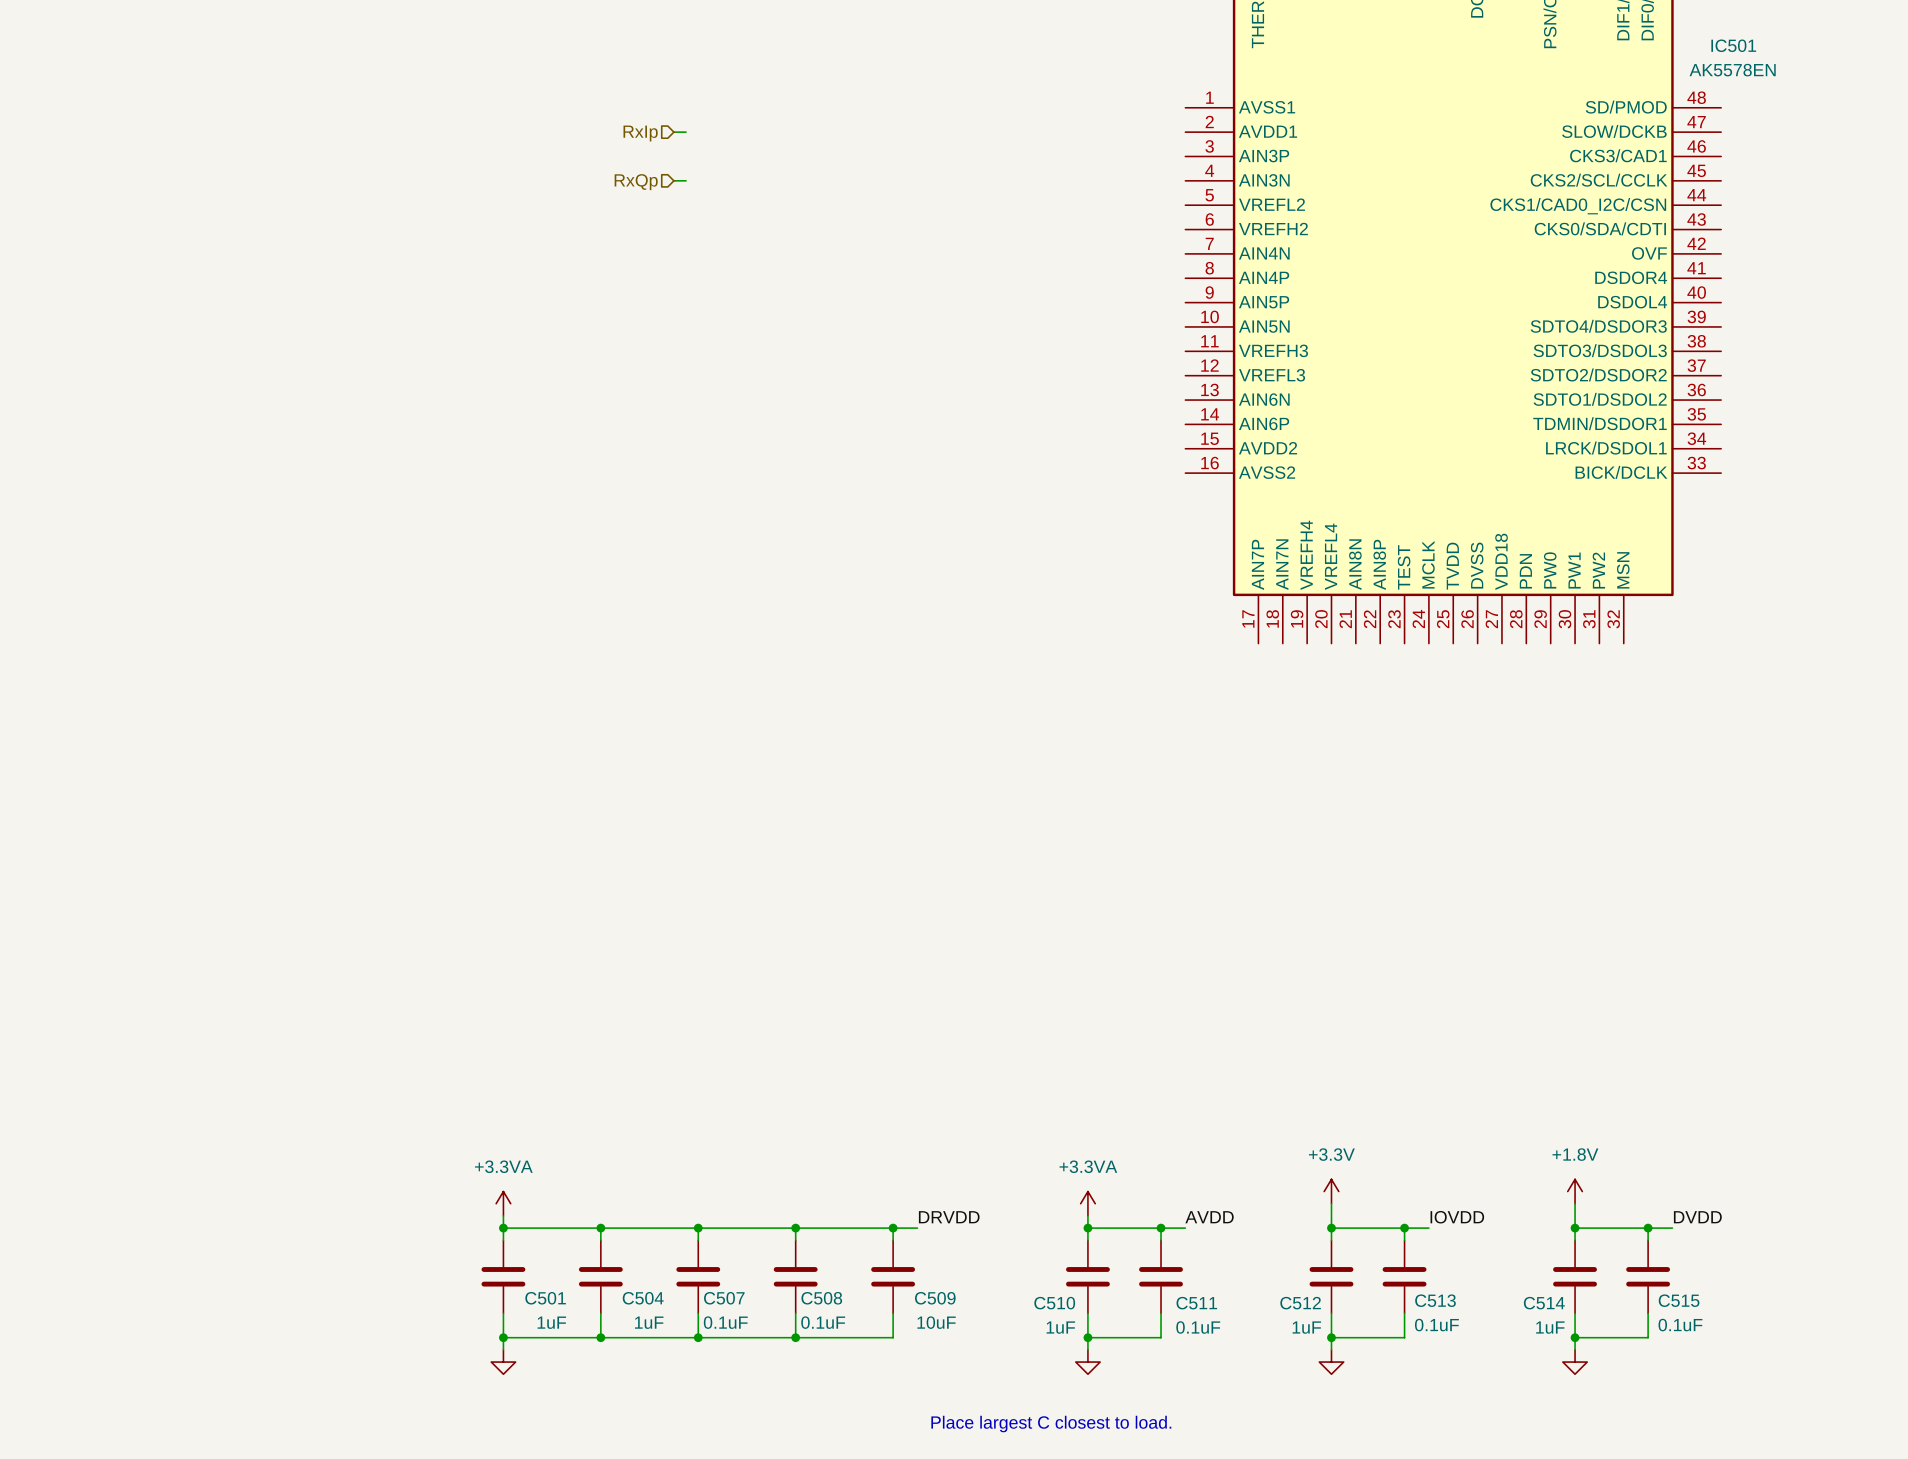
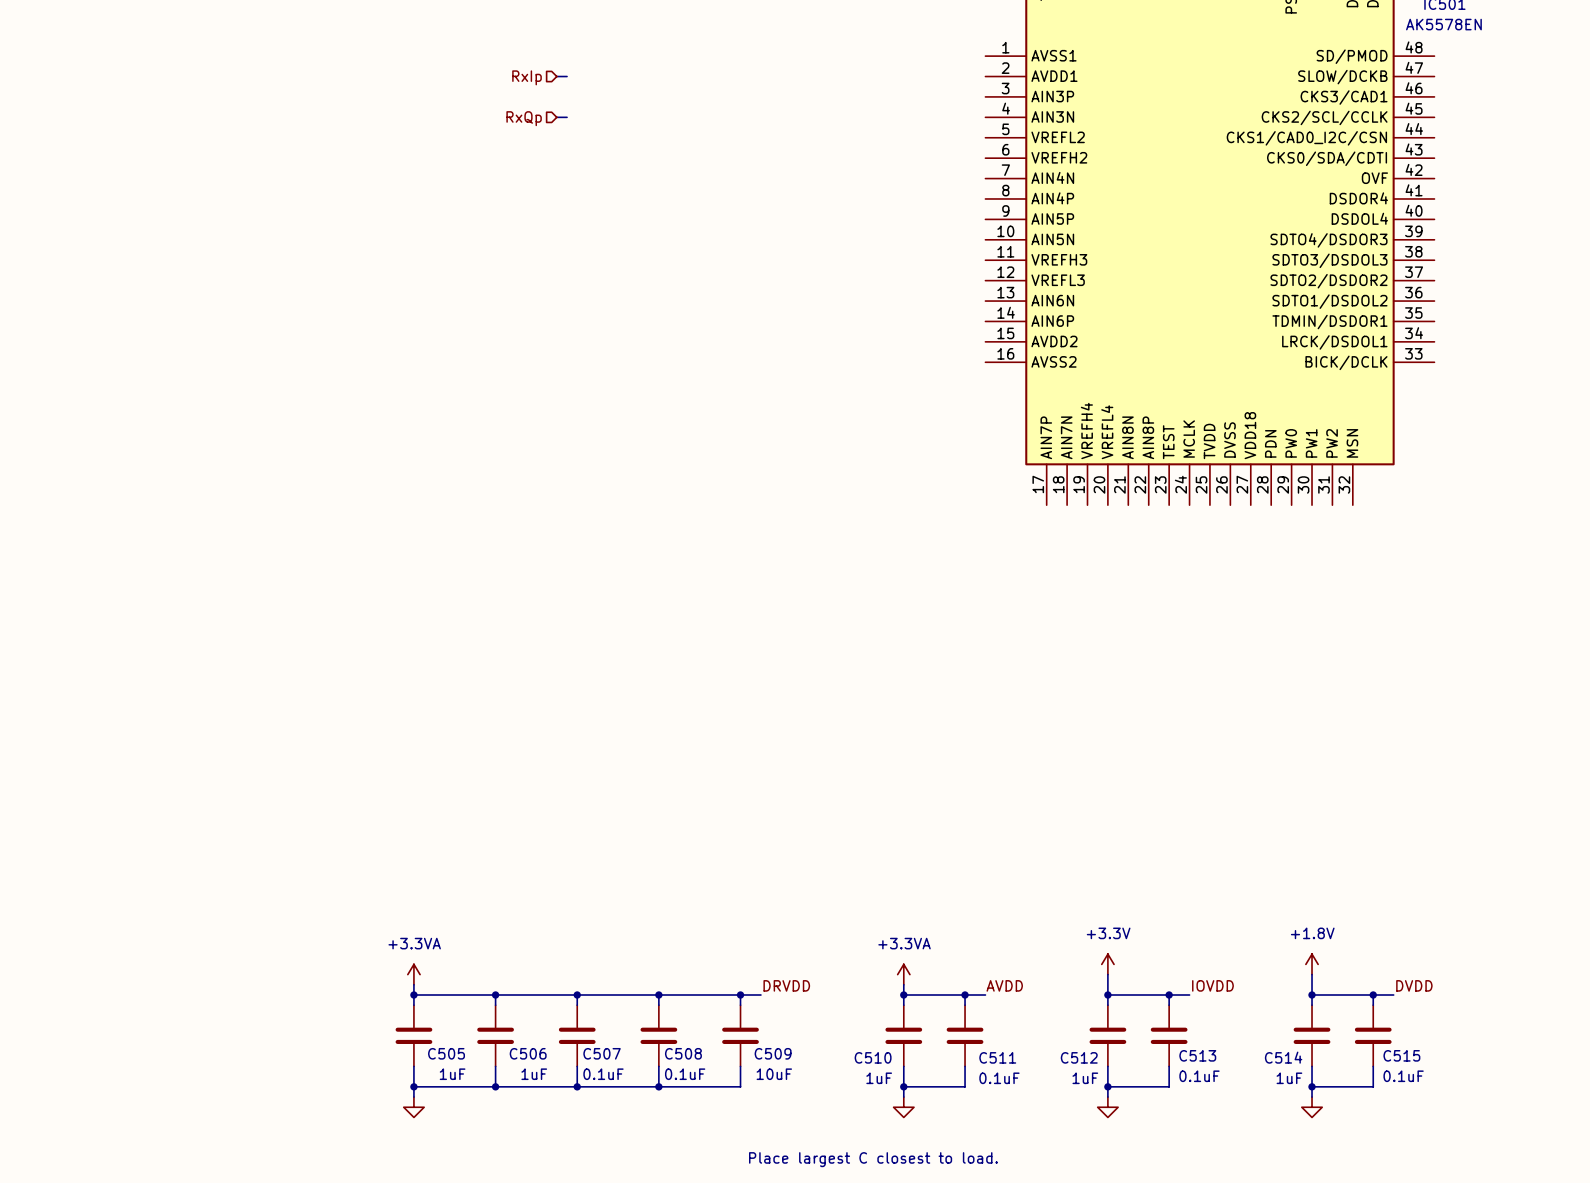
C501 name: C501 (545, 1298) -> C505 (446, 1053)
C504 name: C504 (643, 1298) -> C506 (528, 1053)

